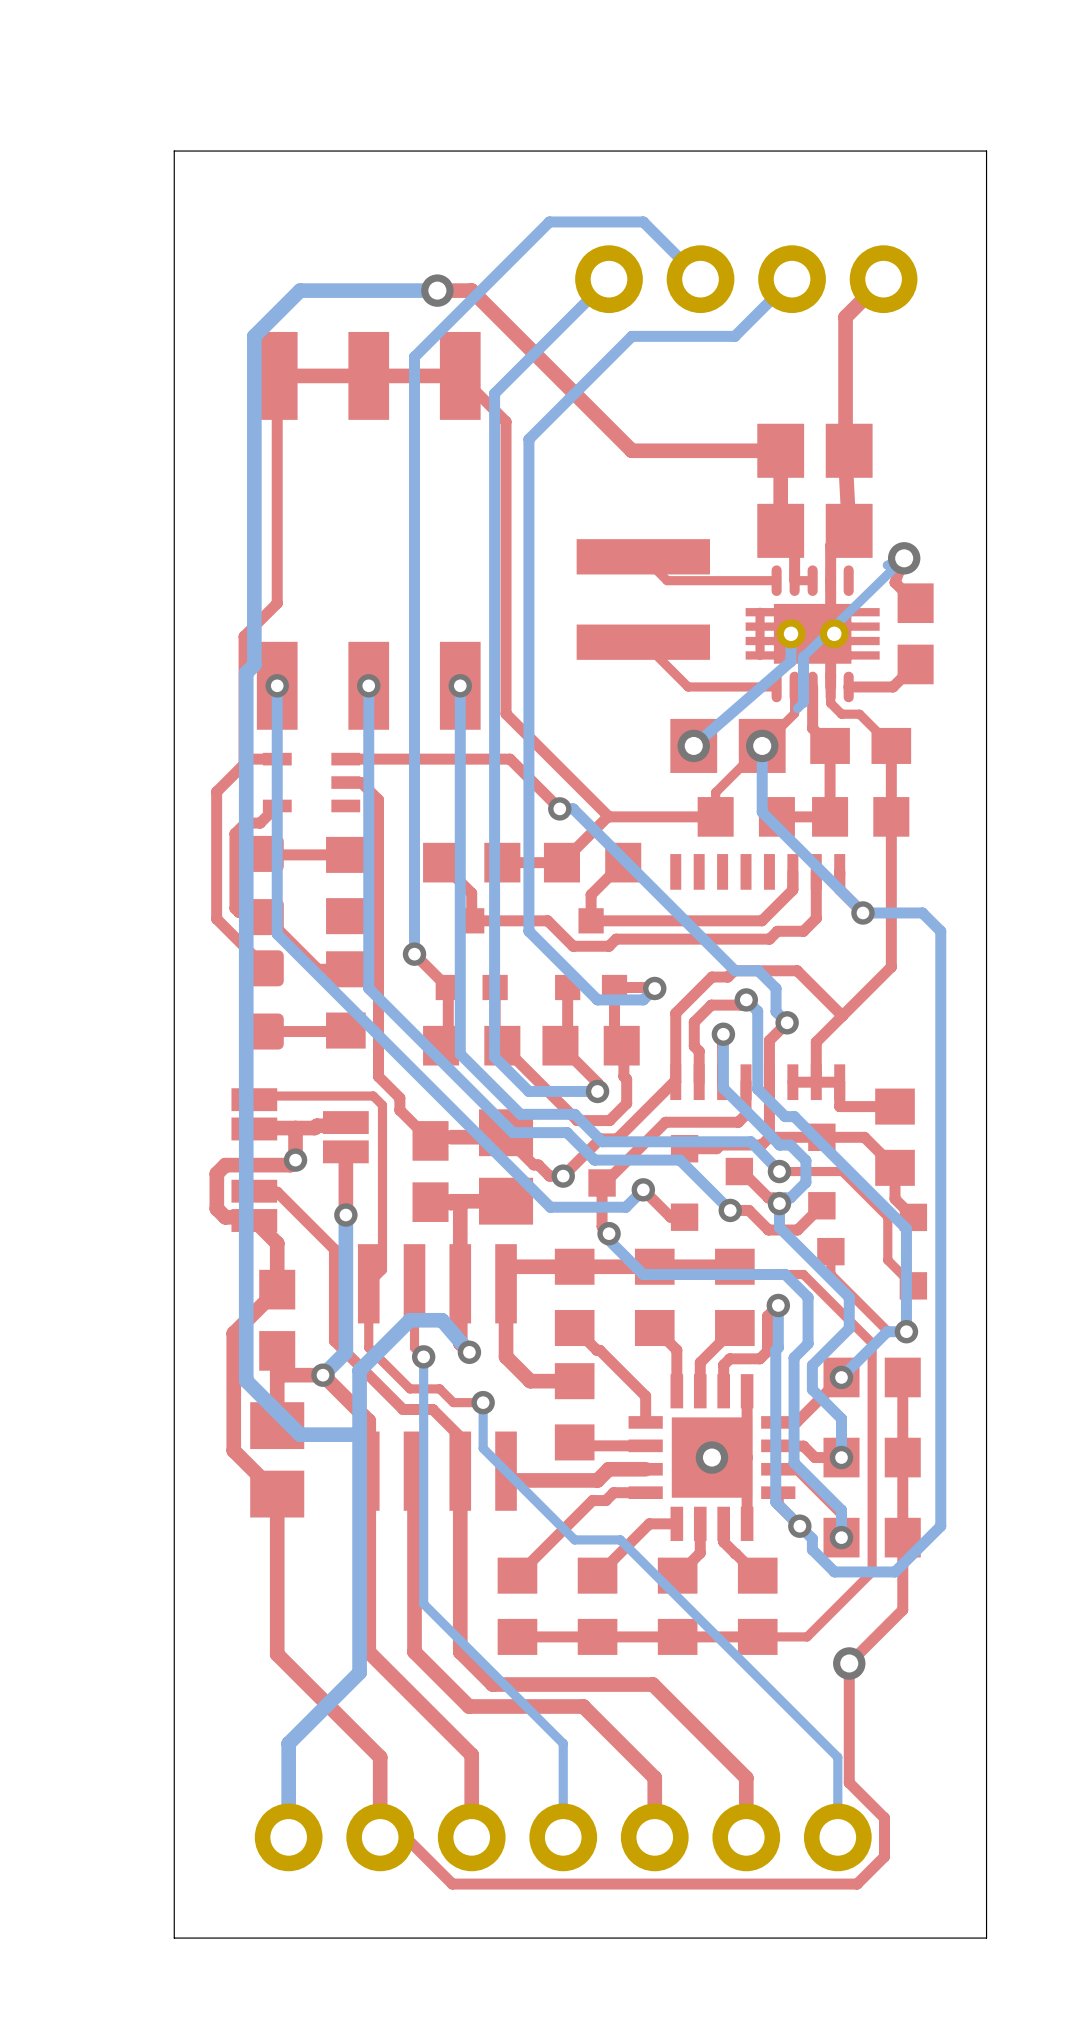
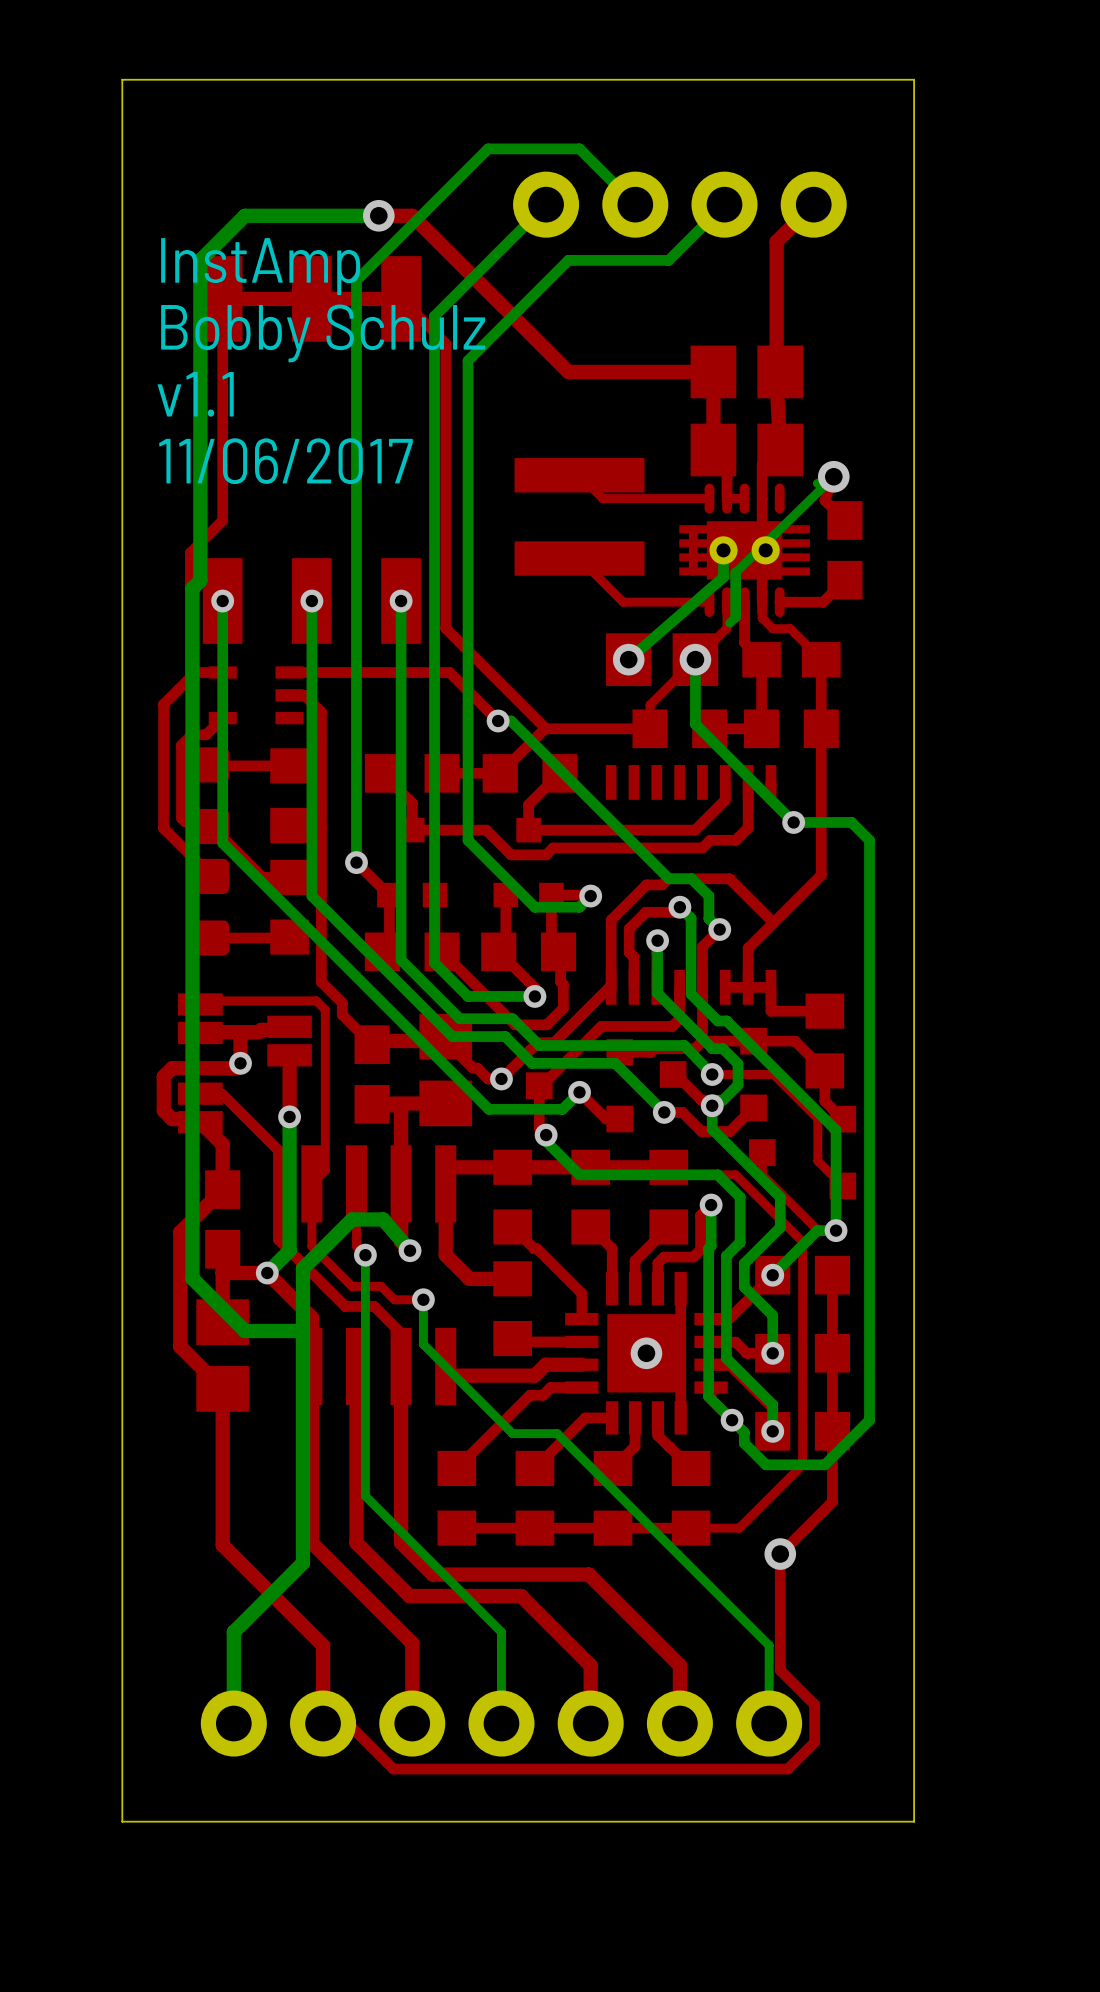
text: none -> InstAmp (260, 266)
text: none -> Bobby Schulz (323, 333)
text: none -> v1.1 (195, 394)
text: none -> 11/06/2017 (285, 461)

